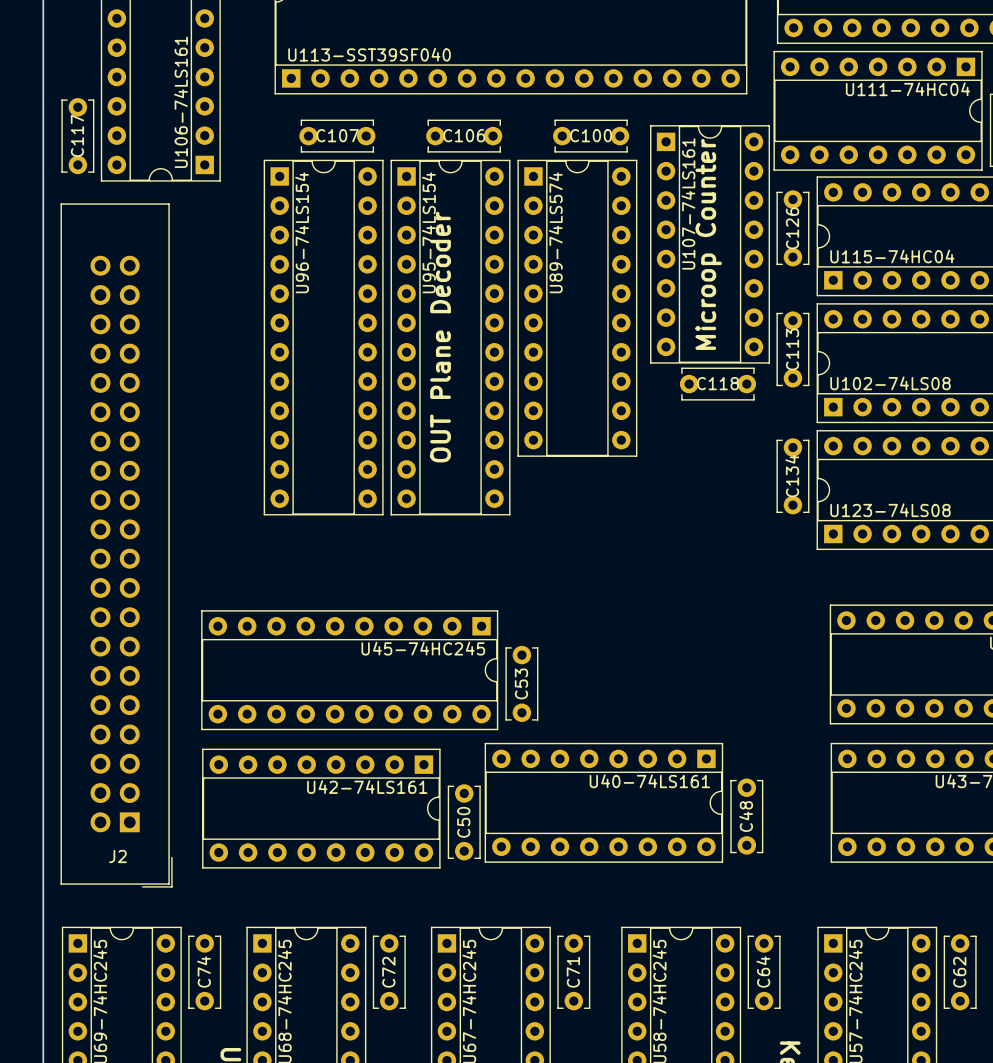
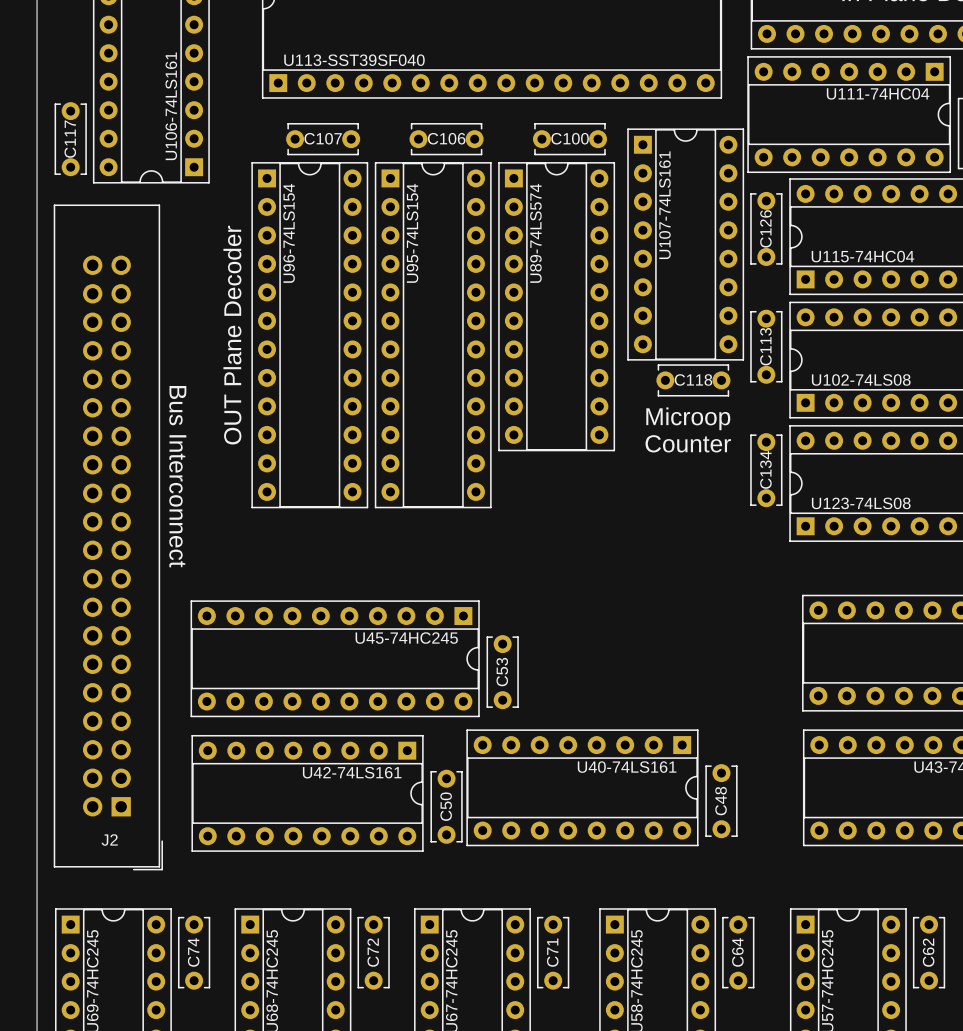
text: Microop Counter (708, 244) -> none
text position: OUT Plane Decoder (440, 337) -> OUT Plane Decoder (232, 335)
text: none -> Microop (688, 418)
text: none -> Counter (688, 443)
text: none -> Bus Interconnect (177, 476)

